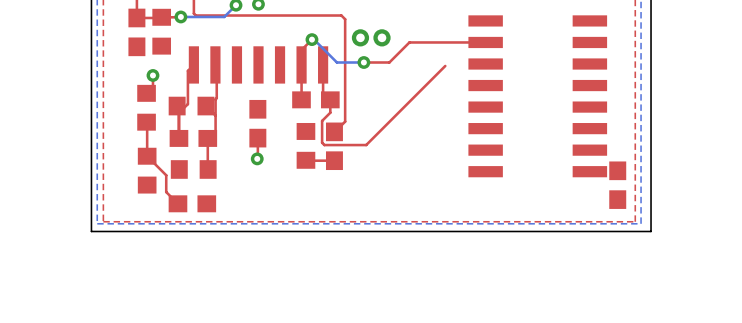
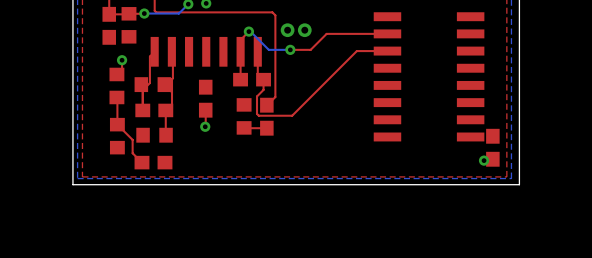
top track: none -> (387, 51) (356, 51) (355, 52)
via: none -> (484, 160)

